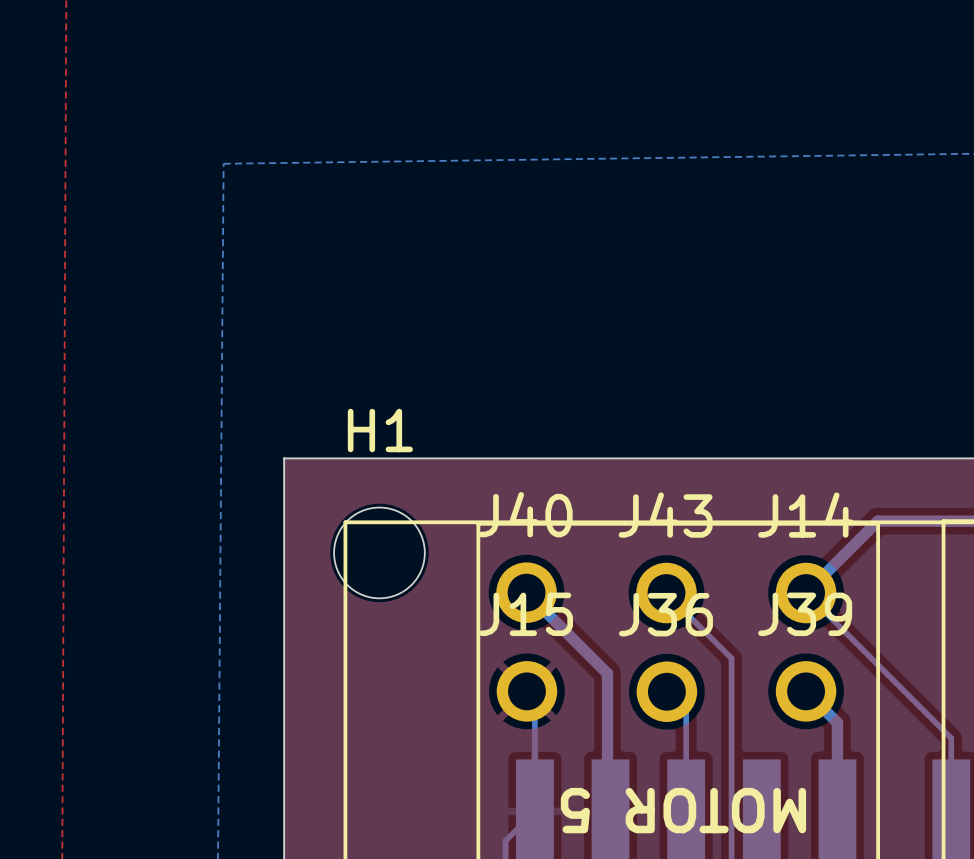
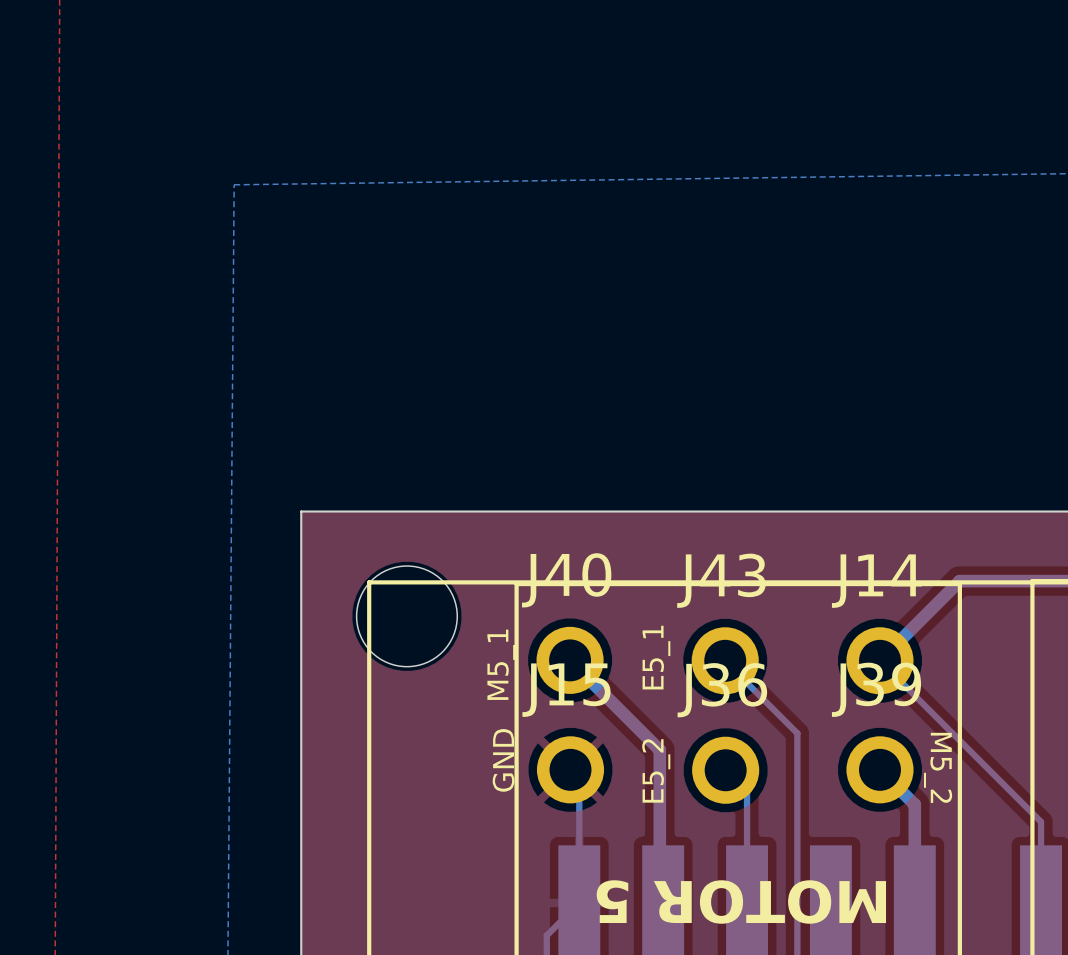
H1 name: H1 (380, 430) -> none
text: none -> E5_1 (656, 657)
text: none -> M5_1 (501, 664)
text: none -> GND (503, 760)
text: none -> E5_2 (656, 770)
text: none -> M5_2 (938, 767)

